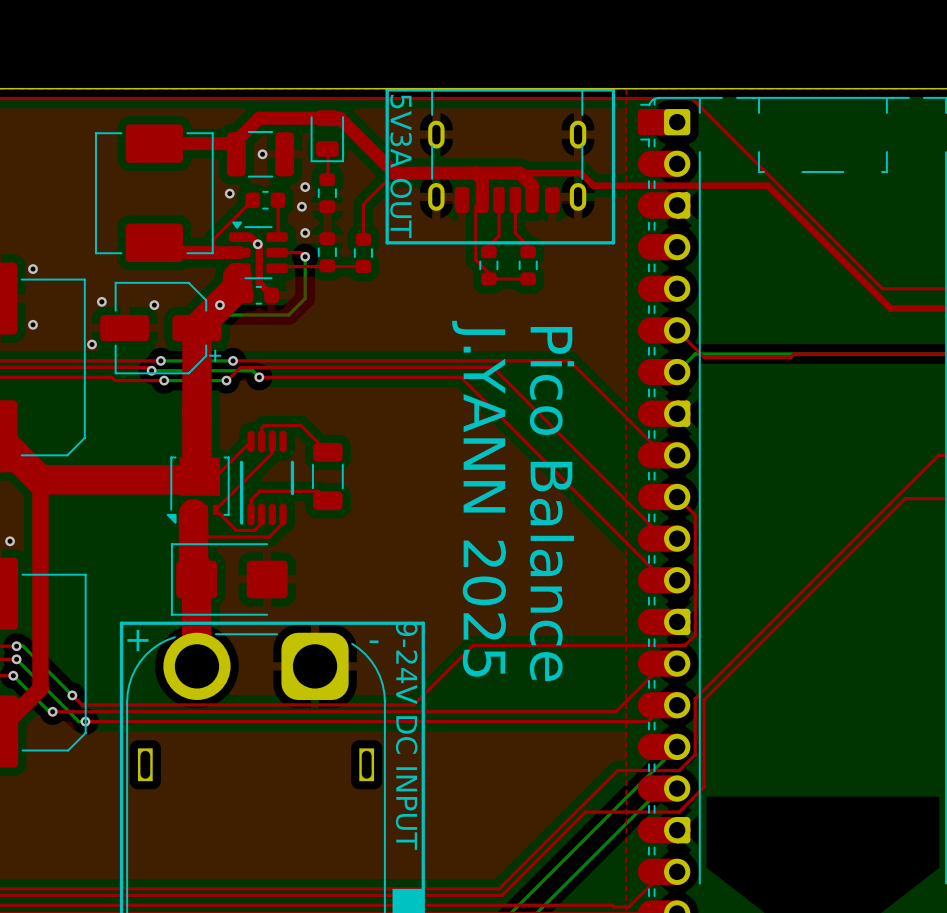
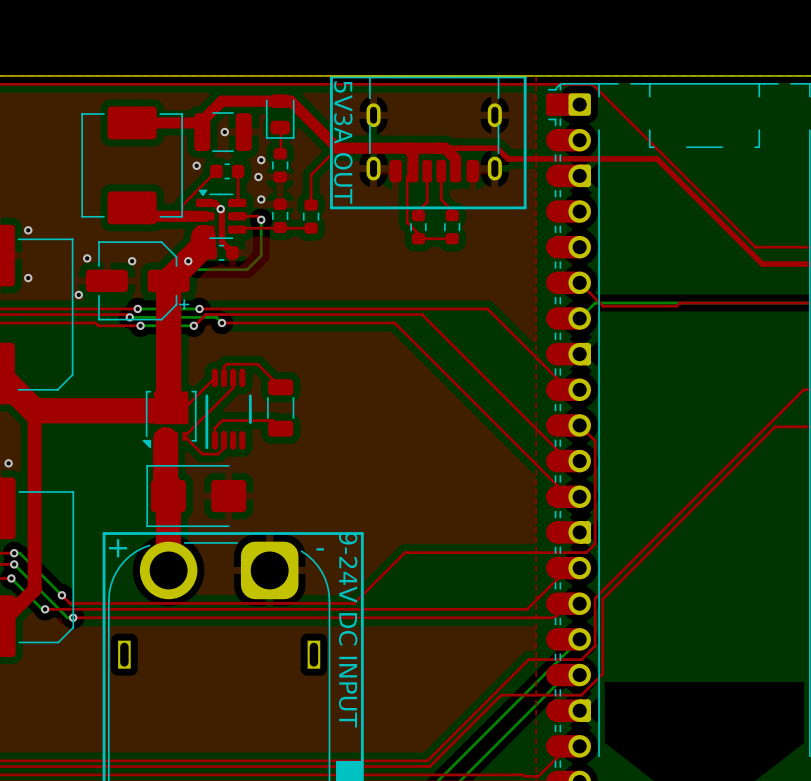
text: J.YANN 2025 (479, 498) -> none
text: Pico Balance (551, 504) -> none
top track: (283, 514) (283, 523) (269, 537) (199, 537) (193, 531) -> none

